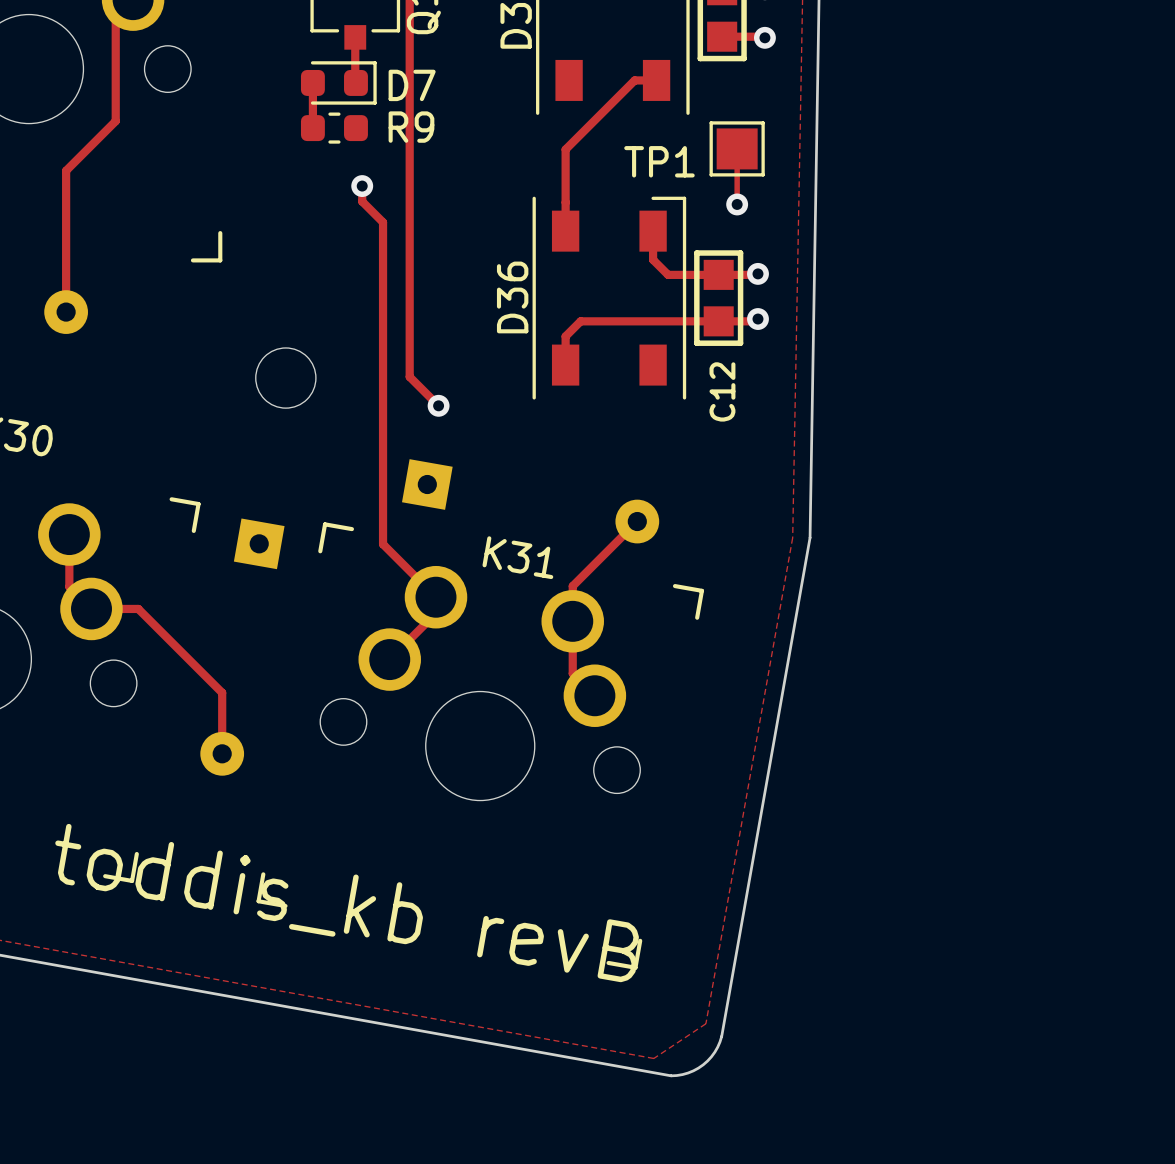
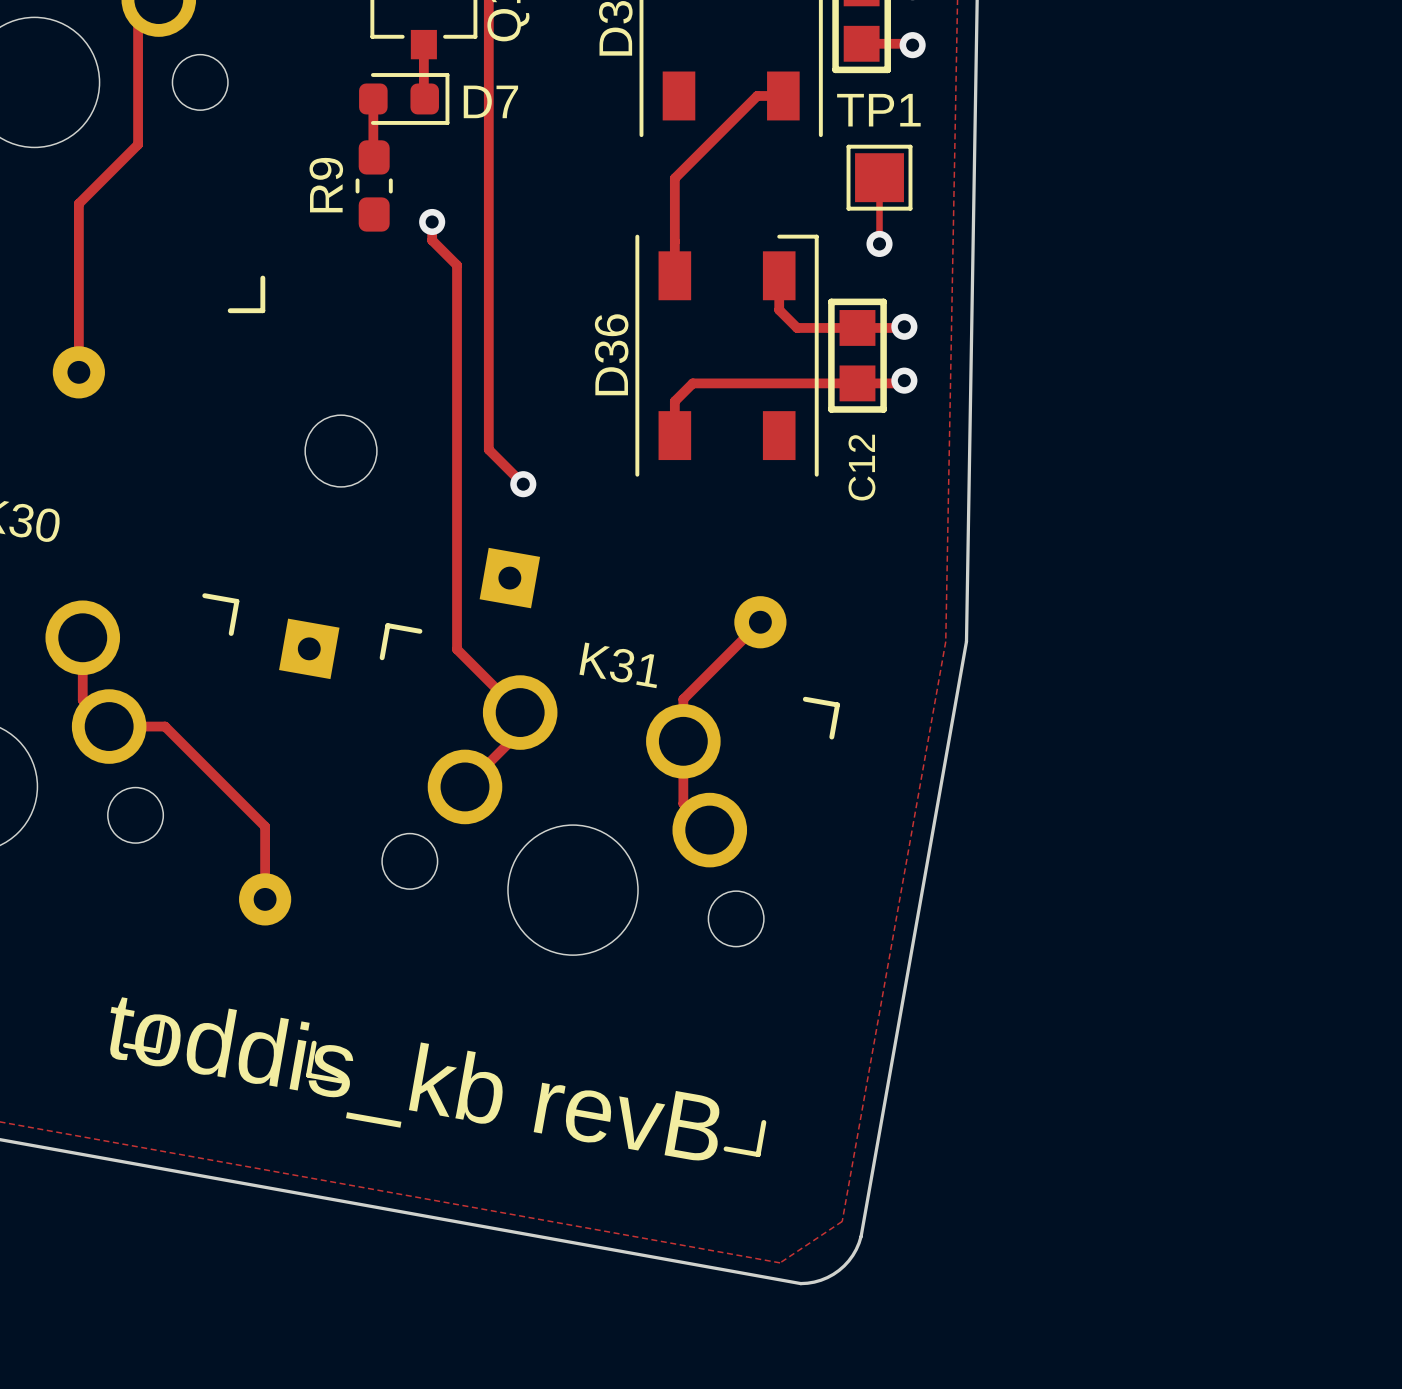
R9 footprint: [300, 112, 368, 144] -> [355, 140, 393, 232]
R9 name position: R9 (411, 127) -> R9 (326, 185)
TP1 name position: TP1 (659, 161) -> TP1 (878, 110)

